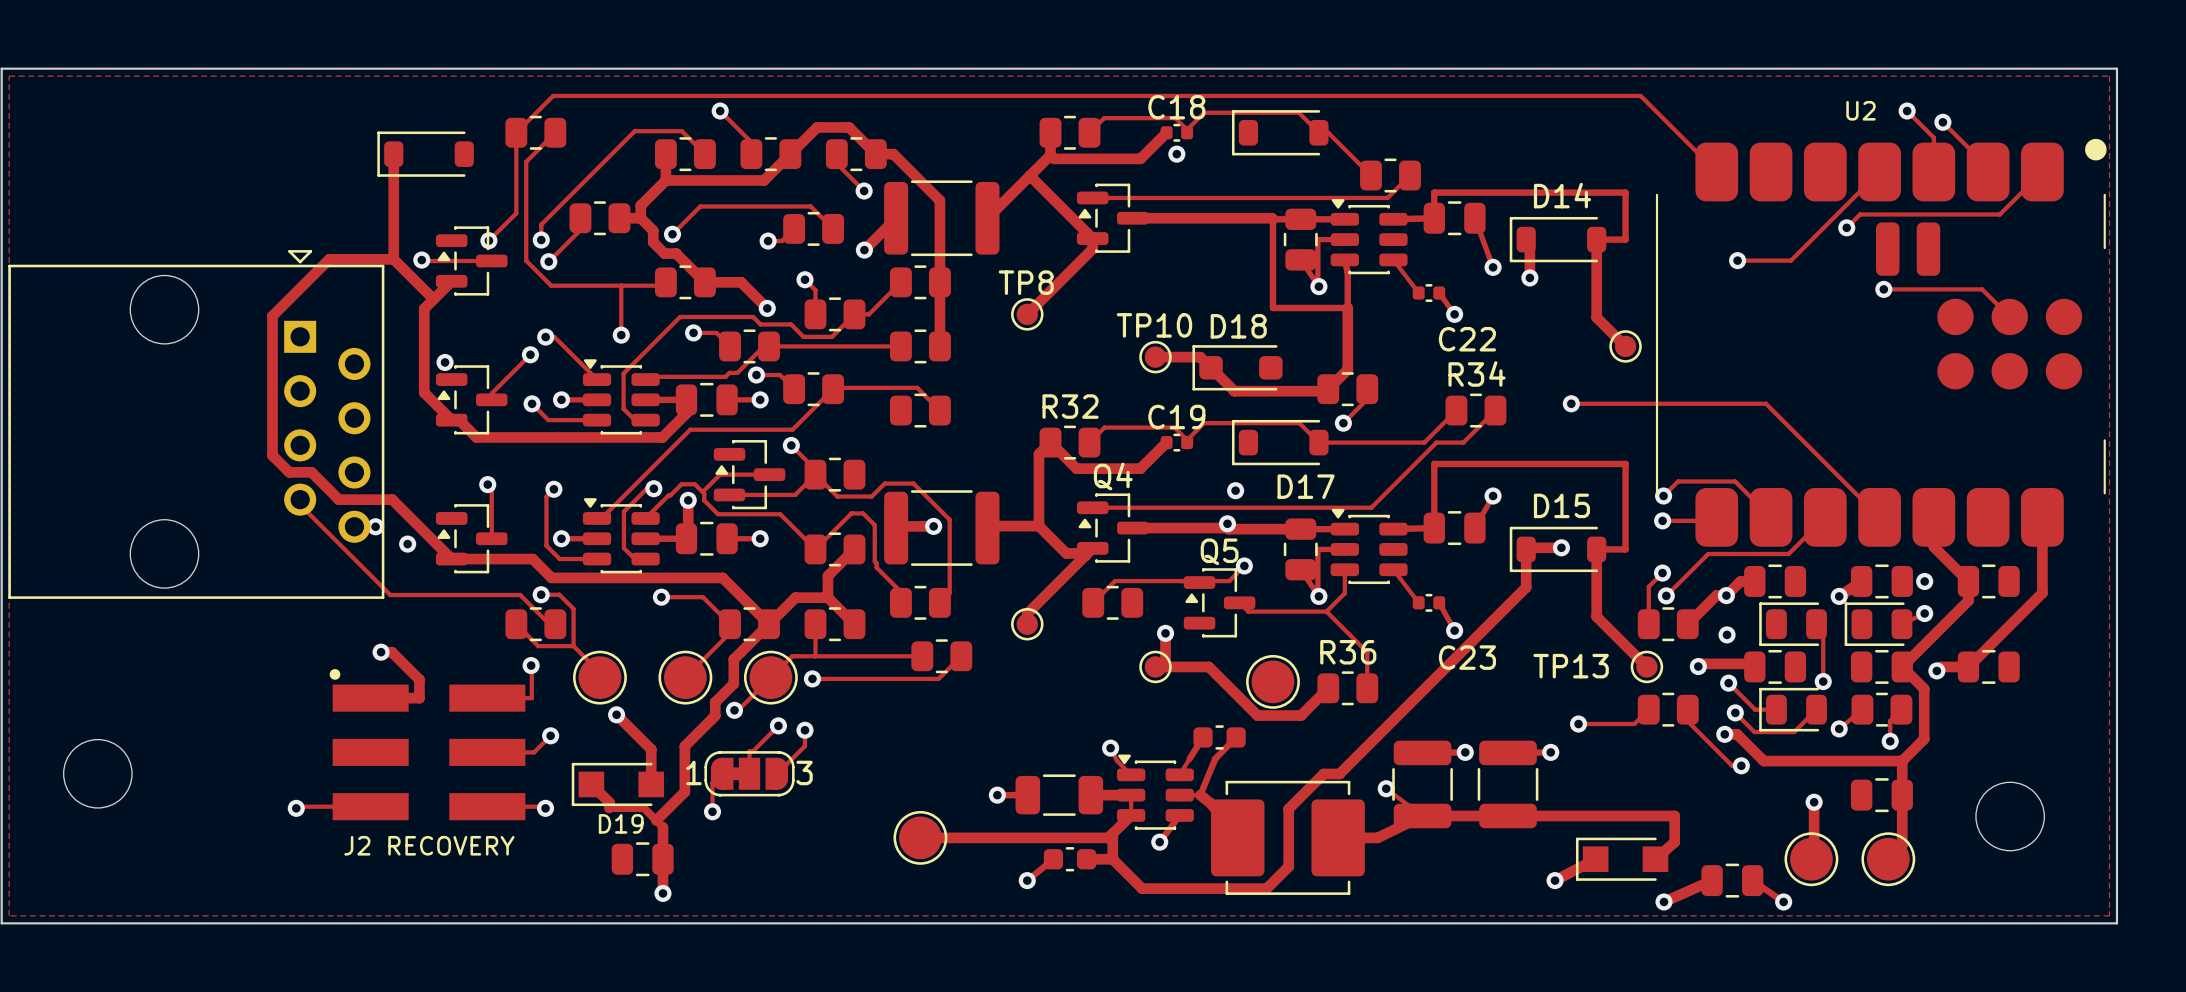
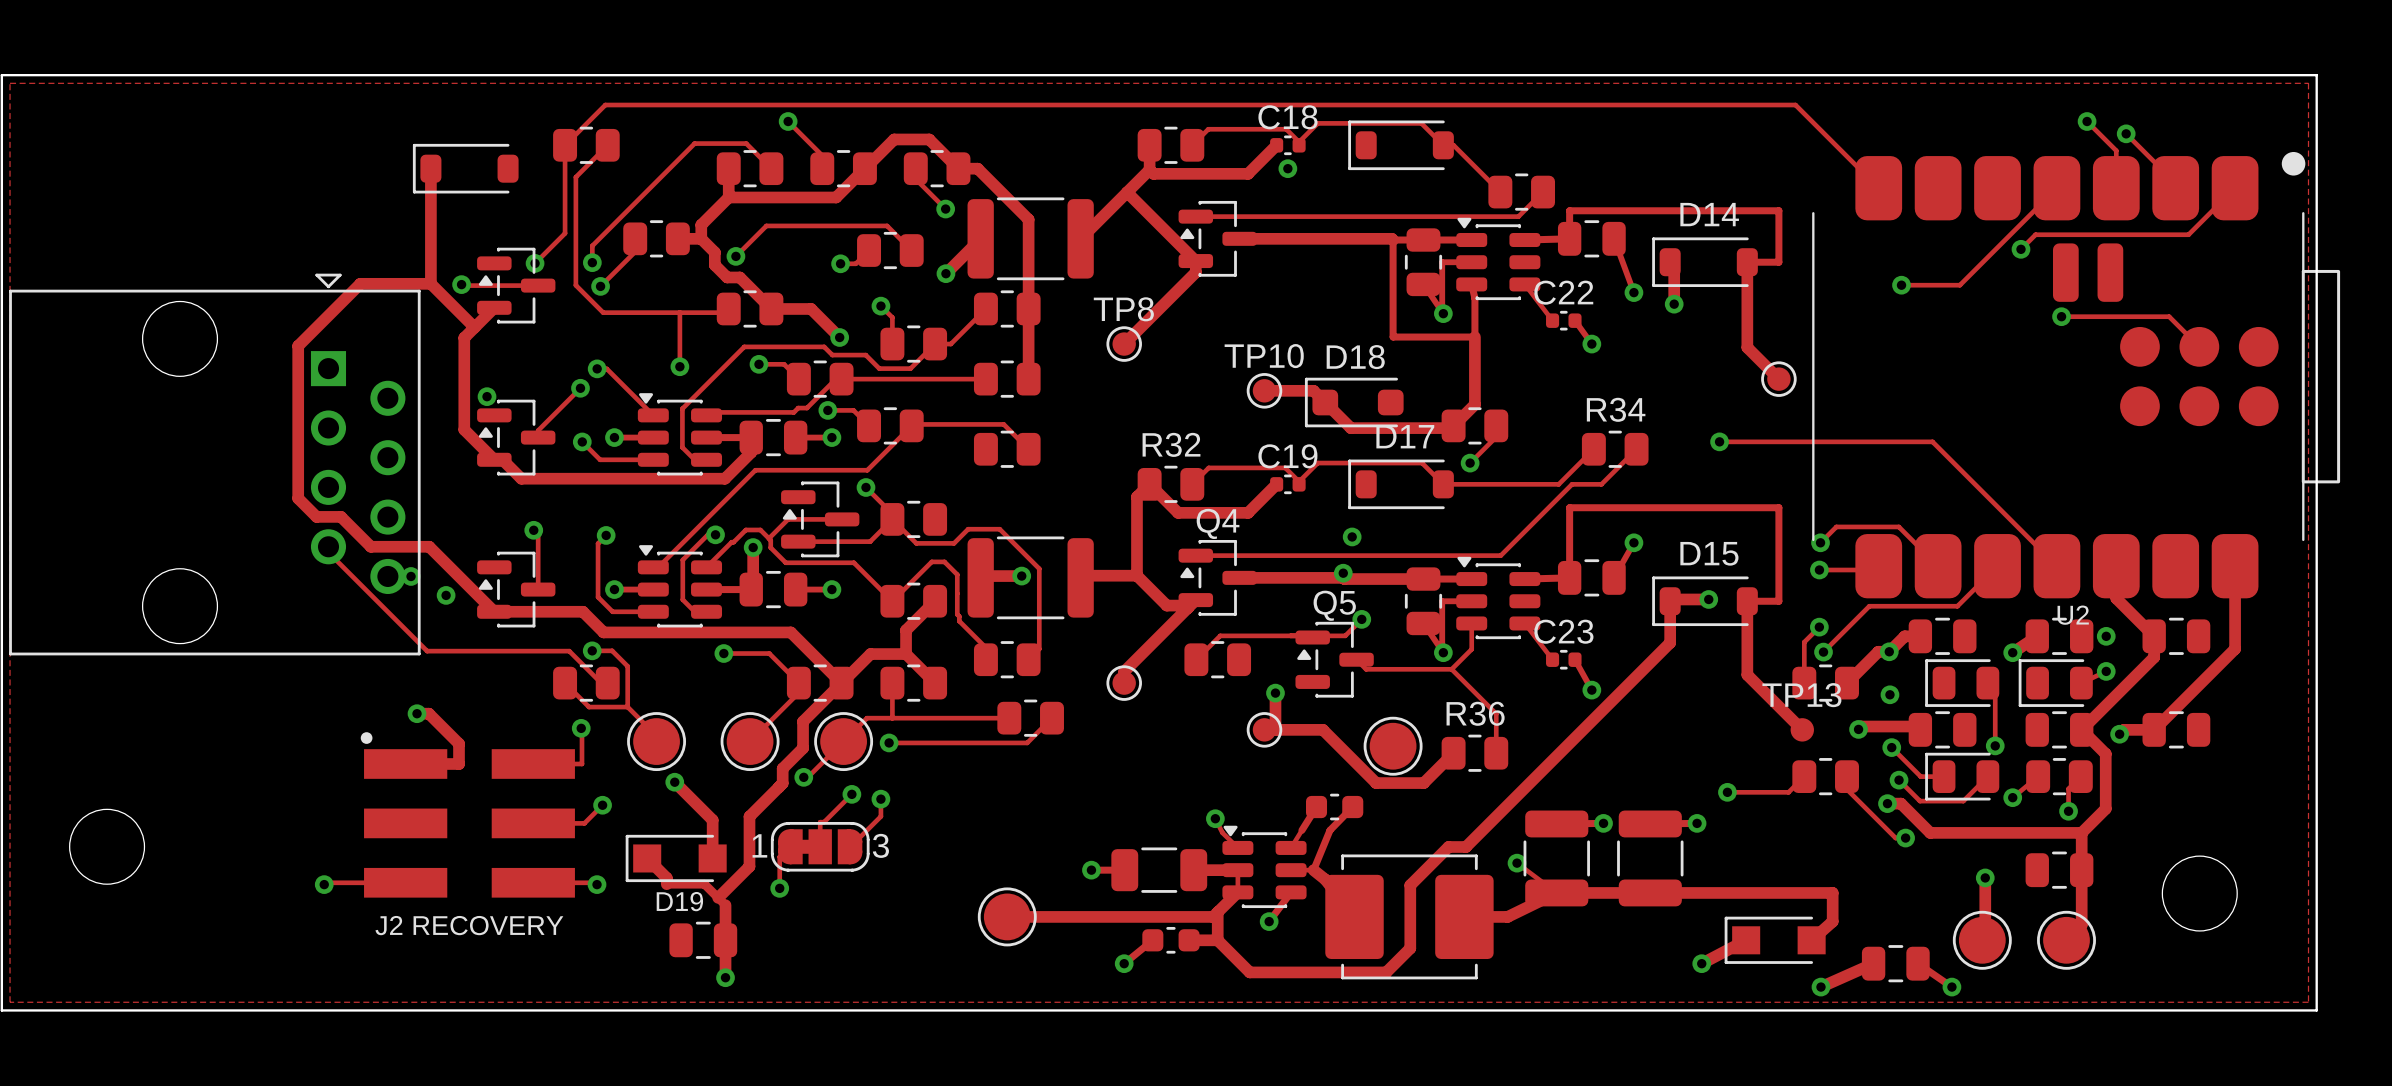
U2 name position: U2 (1860, 110) -> U2 (2073, 615)
U2 footprint: [1655, 138, 2107, 547] -> [1812, 151, 2341, 599]
C22 name position: C22 (1467, 339) -> C22 (1563, 292)
D17 name position: D17 (1306, 486) -> D17 (1405, 436)
TP13 footprint: [1630, 650, 1664, 684] -> [1790, 718, 1814, 742]
C23 name position: C23 (1467, 657) -> C23 (1563, 631)
TP13 name position: TP13 (1571, 666) -> TP13 (1801, 695)

